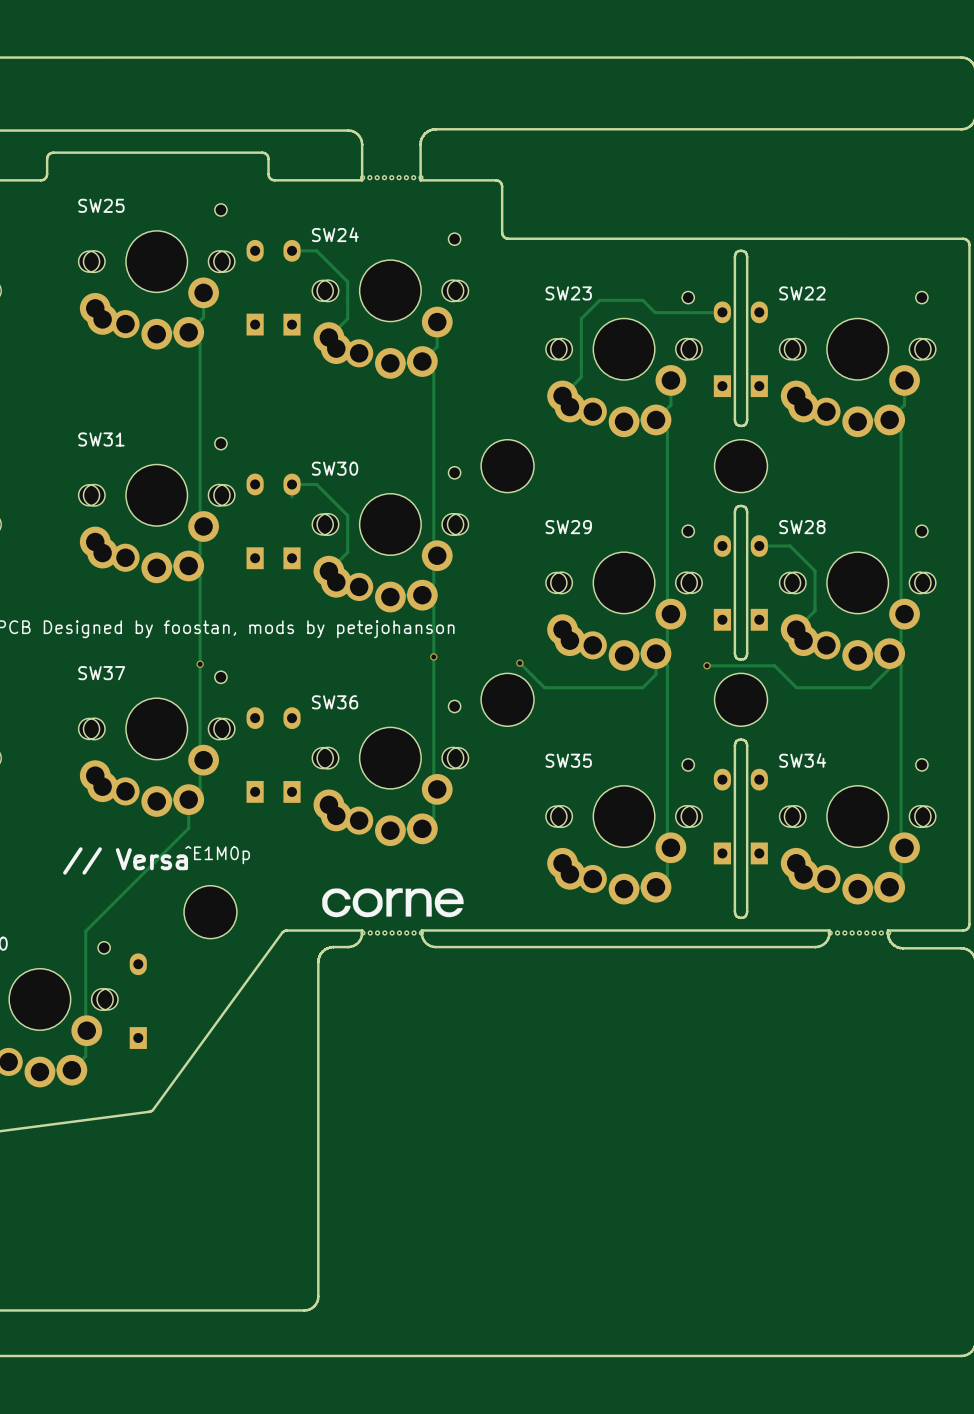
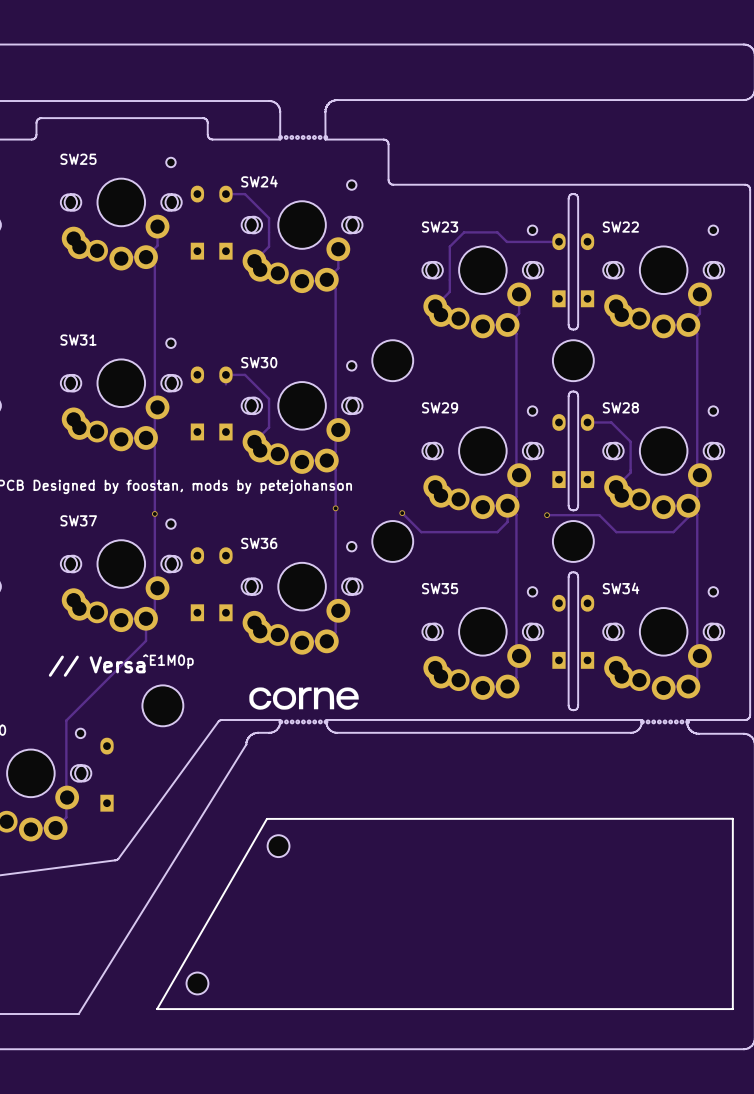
board edge: (318, 962) (318, 1296) (316, 1304) (309, 1309) (304, 1310) (101, 1310) -> (246, 744) (78, 1014)
line: none -> (732, 818) (266, 818) (157, 1009) (732, 1009) (732, 818)
part: none -> (278, 846)
part: none -> (197, 983)

